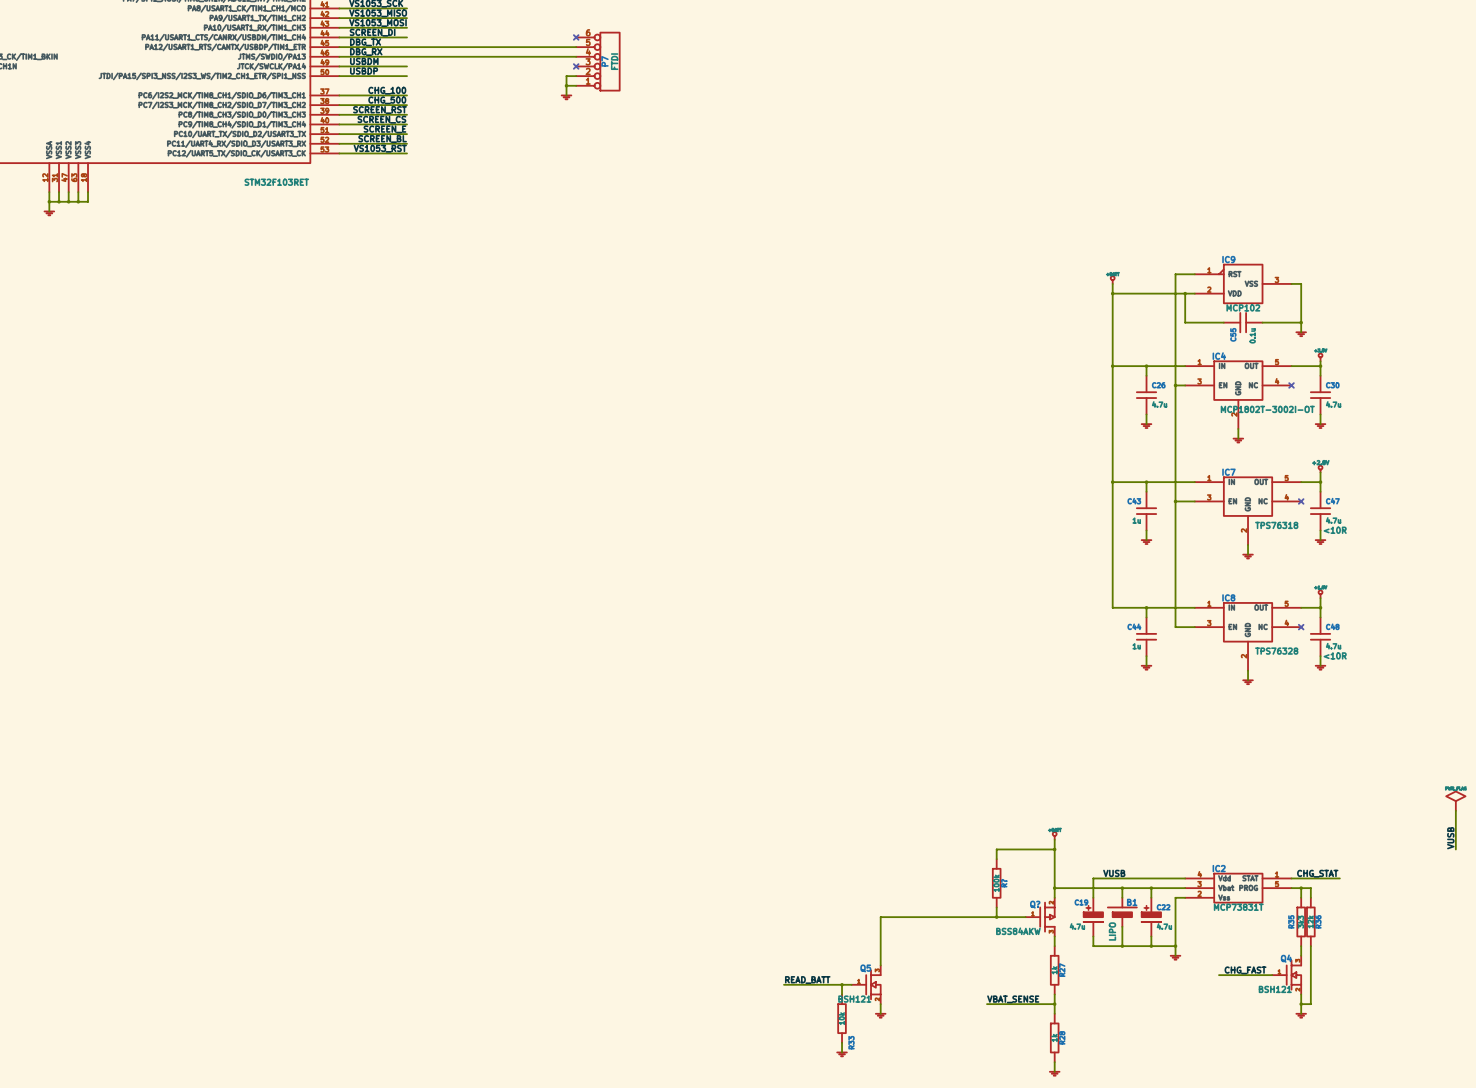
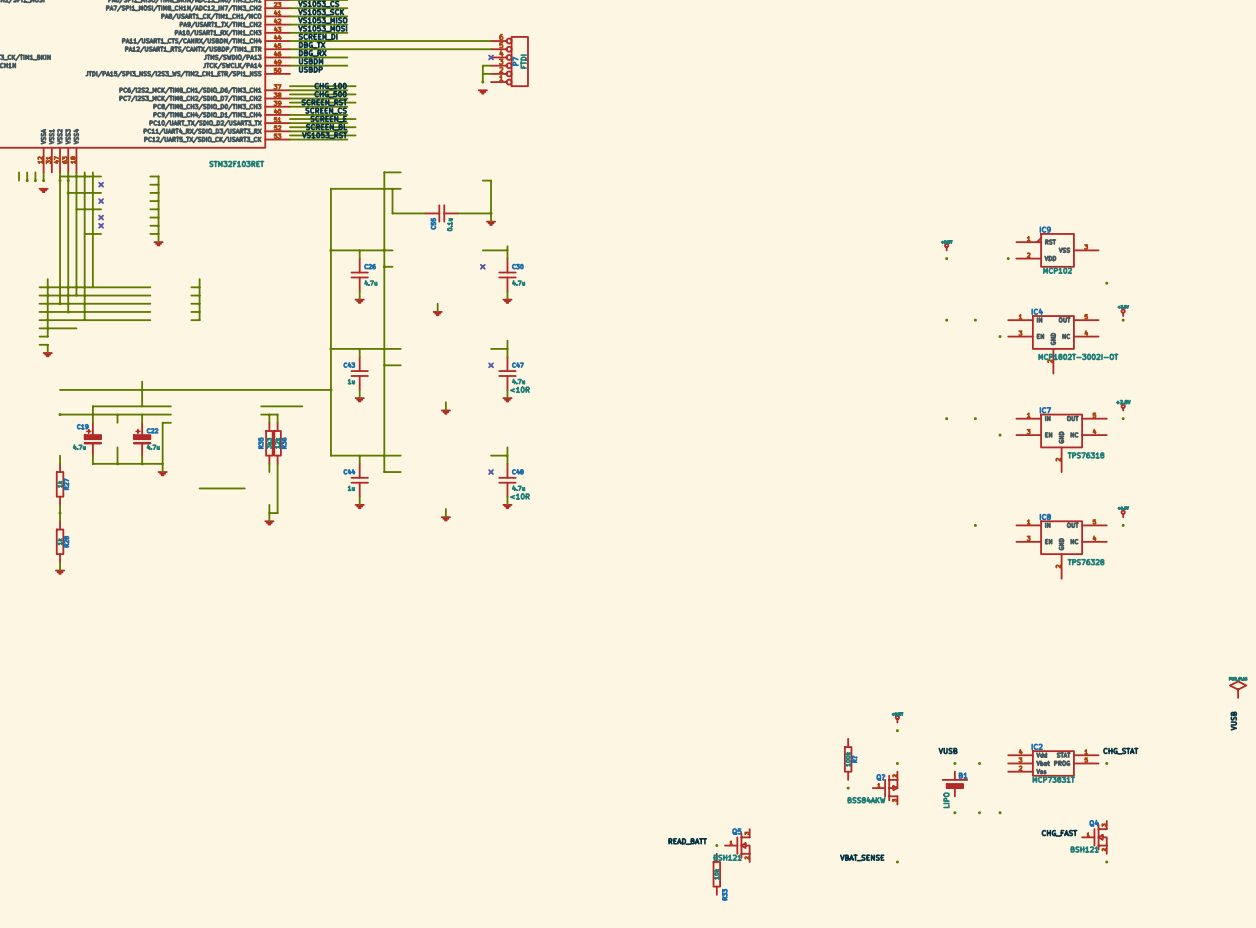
no-connect mark: (576, 37) -> none
wire: (407, 56) (576, 56) -> (347, 41) (491, 41)
no-connect mark: none -> (491, 57)
no-connect mark: (576, 66) -> none
wire: (339, 76) (407, 76) -> none
wire: (576, 85) (566, 85) (566, 95) -> (491, 65) (482, 65) (482, 73)
wire: none -> (289, 86) (355, 86)
wire: none -> (289, 94) (355, 94)
wire: none -> (289, 102) (355, 102)
wire: none -> (289, 119) (355, 119)
wire: none -> (289, 127) (355, 127)
wire: none -> (289, 135) (355, 135)
wire: none -> (18, 172) (18, 180)
wire: none -> (27, 172) (27, 180)
wire: (59, 192) (59, 201) -> (35, 172) (35, 180)
wire: none -> (84, 172) (84, 320)
wire: none -> (92, 172) (92, 287)
wire: none -> (400, 172) (384, 172) (384, 472) (400, 472)
wire: none -> (60, 176) (101, 176)
wire: none -> (150, 176) (158, 176) (158, 242)
junction: none -> (27, 180)
junction: none -> (35, 180)
wire: none -> (60, 180) (60, 303)
wire: none -> (68, 180) (68, 311)
wire: (88, 201) (49, 201) (49, 211) -> (76, 180) (76, 295)
wire: none -> (482, 180) (491, 180) (491, 221)
no-connect mark: none -> (101, 184)
wire: none -> (150, 184) (158, 184)
wire: none -> (392, 188) (392, 213) (425, 213)
wire: none -> (400, 188) (330, 188) (330, 455) (400, 455)
wire: none -> (68, 192) (101, 192)
wire: none -> (150, 192) (158, 192)
no-connect mark: none -> (101, 201)
wire: none -> (150, 201) (158, 201)
wire: none -> (76, 209) (101, 209)
wire: none -> (150, 209) (158, 209)
wire: none -> (458, 213) (491, 213)
no-connect mark: none -> (101, 217)
wire: none -> (150, 217) (158, 217)
power symbol: none -> (491, 223)
no-connect mark: none -> (101, 225)
wire: none -> (150, 225) (158, 225)
wire: none -> (84, 233) (101, 233)
wire: none -> (150, 233) (158, 233)
wire: (1194, 274) (1175, 274) (1175, 627) (1194, 627) -> none
power symbol: none -> (158, 243)
wire: none -> (507, 246) (507, 258)
wire: none -> (330, 250) (392, 250)
wire: none -> (359, 250) (359, 258)
wire: none -> (482, 250) (507, 250)
wire: (1112, 283) (1112, 607) (1194, 607) -> none
wire: (1291, 283) (1301, 283) (1301, 332) -> none
wire: (1112, 293) (1194, 293) -> none
wire: (1185, 293) (1185, 322) (1223, 322) -> none
wire: none -> (384, 266) (392, 266)
no-connect mark: none -> (482, 266)
wire: none -> (47, 279) (47, 336) (39, 336)
wire: none -> (199, 279) (199, 320) (191, 320)
part position: (1243, 322) -> (441, 213)
wire: (1262, 322) (1301, 322) -> none
wire: none -> (39, 287) (150, 287)
wire: none -> (191, 287) (199, 287)
wire: none -> (359, 291) (359, 299)
wire: none -> (507, 291) (507, 299)
power symbol: (1301, 334) -> none
wire: none -> (39, 295) (150, 295)
wire: none -> (191, 295) (199, 295)
power symbol: none -> (359, 301)
power symbol: none -> (507, 301)
wire: none -> (39, 303) (150, 303)
wire: none -> (191, 303) (199, 303)
wire: none -> (437, 303) (437, 311)
wire: none -> (39, 311) (150, 311)
wire: none -> (191, 311) (199, 311)
power symbol: none -> (437, 313)
wire: (1320, 361) (1320, 375) -> none
wire: none -> (39, 320) (150, 320)
wire: (1112, 366) (1185, 366) -> none
wire: (1146, 366) (1146, 375) -> none
wire: (1291, 366) (1320, 366) -> none
wire: none -> (39, 328) (76, 328)
wire: (1175, 385) (1185, 385) -> none
no-connect mark: (1291, 385) -> none
wire: none -> (507, 340) (507, 357)
wire: none -> (39, 344) (47, 344) (47, 353)
part position: (1146, 395) -> (359, 275)
part position: (1320, 395) -> (507, 275)
wire: none -> (330, 348) (400, 348)
wire: none -> (359, 348) (359, 357)
wire: none -> (491, 348) (507, 348)
power symbol: none -> (47, 354)
wire: (1146, 414) (1146, 424) -> none
wire: (1320, 414) (1320, 424) -> none
wire: none -> (384, 365) (400, 365)
no-connect mark: none -> (491, 365)
power symbol: (1146, 426) -> none
power symbol: (1320, 426) -> none
wire: (1238, 428) (1238, 438) -> none
wire: none -> (142, 381) (142, 406)
power symbol: (1238, 440) -> none
wire: none -> (60, 389) (330, 389)
wire: none -> (359, 389) (359, 398)
wire: none -> (507, 389) (507, 398)
power symbol: none -> (359, 399)
power symbol: none -> (507, 399)
wire: none -> (445, 402) (445, 410)
wire: none -> (170, 406) (92, 406) (92, 422)
wire: none -> (261, 406) (302, 406)
wire: (1320, 472) (1320, 491) -> none
power symbol: none -> (445, 412)
wire: none -> (60, 414) (170, 414)
junction: none -> (60, 414)
wire: none -> (117, 414) (117, 422)
wire: none -> (142, 414) (142, 422)
wire: none -> (261, 414) (277, 414) (277, 422)
wire: none -> (269, 414) (269, 422)
wire: (1112, 482) (1194, 482) -> none
wire: (1146, 482) (1146, 491) -> none
wire: (1301, 482) (1320, 482) -> none
wire: none -> (170, 422) (162, 422) (162, 472)
wire: (1175, 501) (1194, 501) -> none
no-connect mark: (1301, 501) -> none
part position: (1146, 511) -> (359, 373)
part position: (1320, 511) -> (507, 373)
wire: none -> (117, 447) (117, 463)
wire: none -> (507, 447) (507, 463)
wire: none -> (60, 455) (60, 463)
wire: none -> (92, 455) (92, 463) (162, 463)
wire: none -> (142, 455) (142, 463)
wire: none -> (359, 455) (359, 463)
wire: none -> (491, 455) (507, 455)
wire: (1146, 530) (1146, 540) -> none
wire: (1320, 530) (1320, 540) -> none
wire: none -> (269, 463) (269, 472)
wire: none -> (277, 463) (277, 513) (269, 513)
power symbol: (1146, 542) -> none
power symbol: (1320, 542) -> none
no-connect mark: none -> (491, 472)
wire: (1248, 544) (1248, 554) -> none
power symbol: none -> (162, 473)
power symbol: (1248, 556) -> none
wire: none -> (199, 488) (244, 488)
wire: none -> (359, 496) (359, 504)
wire: none -> (507, 496) (507, 504)
wire: none -> (60, 504) (60, 521)
wire: none -> (269, 504) (269, 521)
power symbol: none -> (359, 506)
power symbol: none -> (507, 506)
wire: none -> (445, 508) (445, 517)
wire: (1320, 598) (1320, 617) -> none
power symbol: none -> (445, 518)
power symbol: none -> (269, 522)
wire: (1146, 607) (1146, 617) -> none
wire: (1301, 607) (1320, 607) -> none
no-connect mark: (1301, 627) -> none
part position: (1146, 636) -> (359, 480)
part position: (1320, 636) -> (507, 480)
wire: none -> (60, 562) (60, 570)
wire: (1146, 656) (1146, 665) -> none
wire: (1320, 656) (1320, 665) -> none
power symbol: none -> (60, 572)
power symbol: (1146, 667) -> none
power symbol: (1320, 667) -> none
wire: (1248, 670) (1248, 680) -> none
power symbol: (1248, 682) -> none
wire: (1455, 810) (1455, 849) -> none
wire: (1054, 839) (1054, 897) -> none
wire: (1054, 849) (996, 849) (996, 859) -> none
wire: (1185, 878) (1093, 878) (1093, 897) -> none
wire: (1291, 878) (1339, 878) -> none
wire: (1054, 888) (1185, 888) -> none
wire: (1122, 888) (1122, 897) -> none
wire: (1151, 888) (1151, 897) -> none
wire: (1291, 888) (1310, 888) (1310, 897) -> none
wire: (1301, 888) (1301, 897) -> none
wire: (1185, 897) (1175, 897) (1175, 955) -> none
wire: (996, 907) (996, 917) -> none
wire: (1025, 917) (880, 917) (880, 965) -> none
part position: (1093, 917) -> (92, 439)
part position: (1151, 917) -> (142, 439)
part position: (1301, 921) -> (269, 443)
part position: (1310, 921) -> (277, 443)
wire: (1122, 926) (1122, 946) -> none
wire: (1054, 936) (1054, 946) -> none
wire: (1093, 936) (1093, 946) (1175, 946) -> none
wire: (1151, 936) (1151, 946) -> none
wire: (1301, 946) (1301, 955) -> none
wire: (1310, 946) (1310, 1004) (1301, 1004) -> none
power symbol: (1175, 957) -> none
part position: (1054, 970) -> (60, 484)
wire: (1219, 975) (1272, 975) -> none
wire: (784, 984) (851, 984) -> none
wire: (842, 984) (842, 994) -> none
wire: (1054, 994) (1054, 1013) -> none
wire: (1301, 994) (1301, 1013) -> none
wire: (880, 1004) (880, 1013) -> none
wire: (987, 1004) (1054, 1004) -> none
power symbol: (880, 1015) -> none
power symbol: (1301, 1015) -> none
part position: (1054, 1037) -> (60, 541)
wire: (842, 1042) (842, 1052) -> none
power symbol: (842, 1054) -> none
wire: (1054, 1062) (1054, 1071) -> none
power symbol: (1054, 1073) -> none

